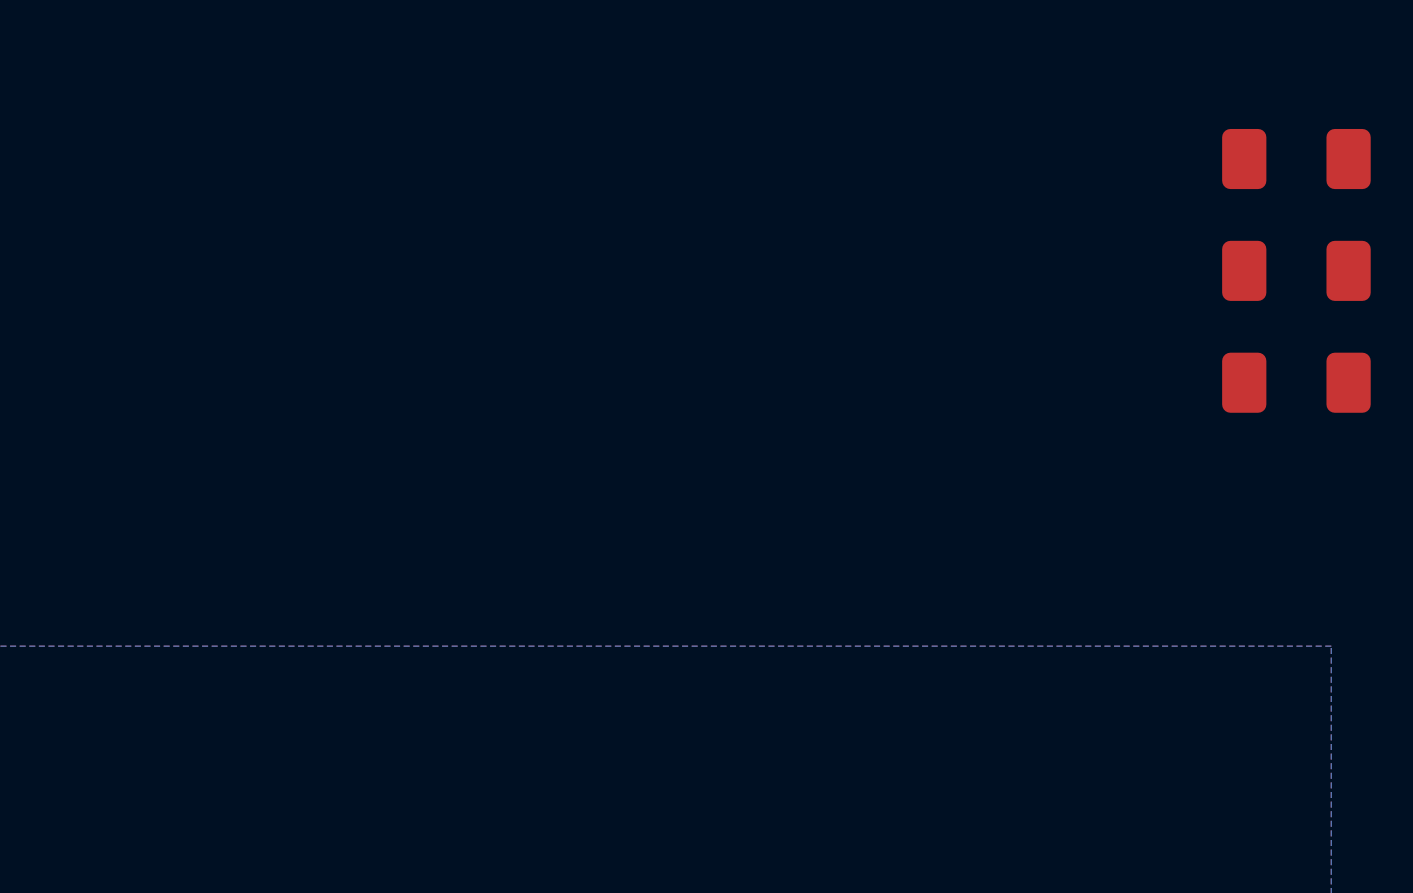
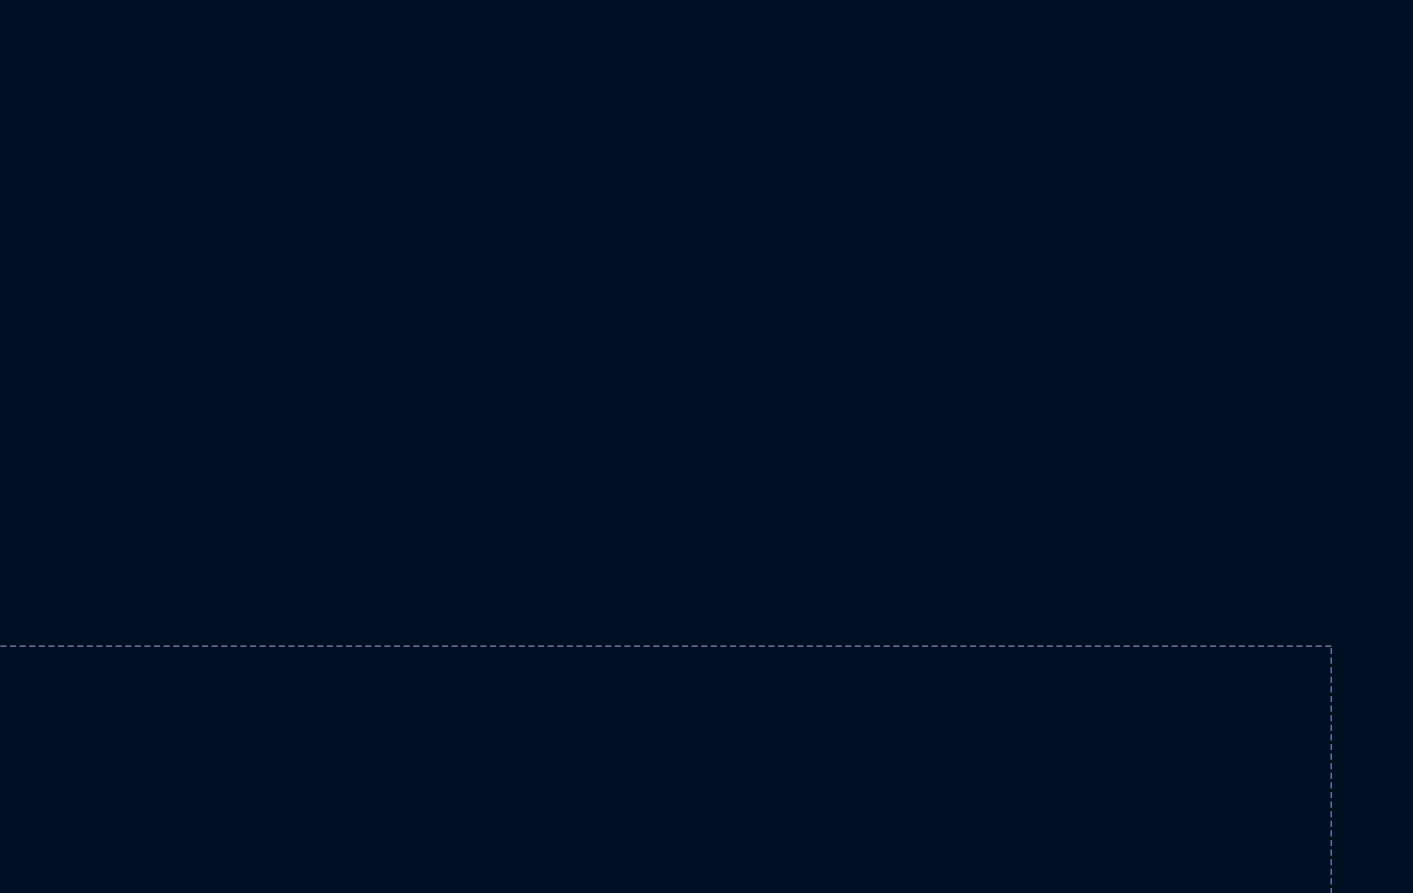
part: (1296, 159) -> none
part: (1296, 270) -> none
part: (1296, 382) -> none

